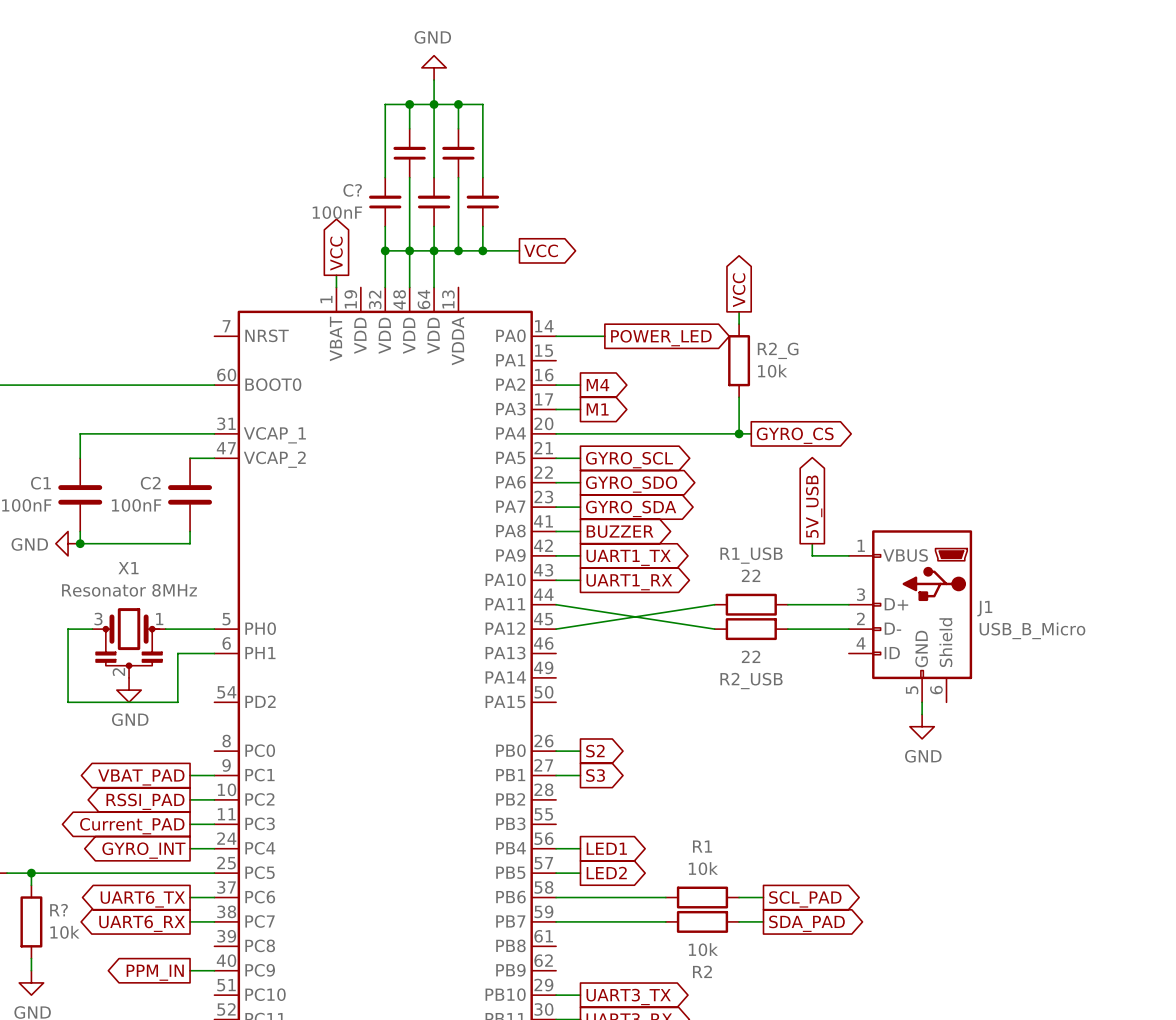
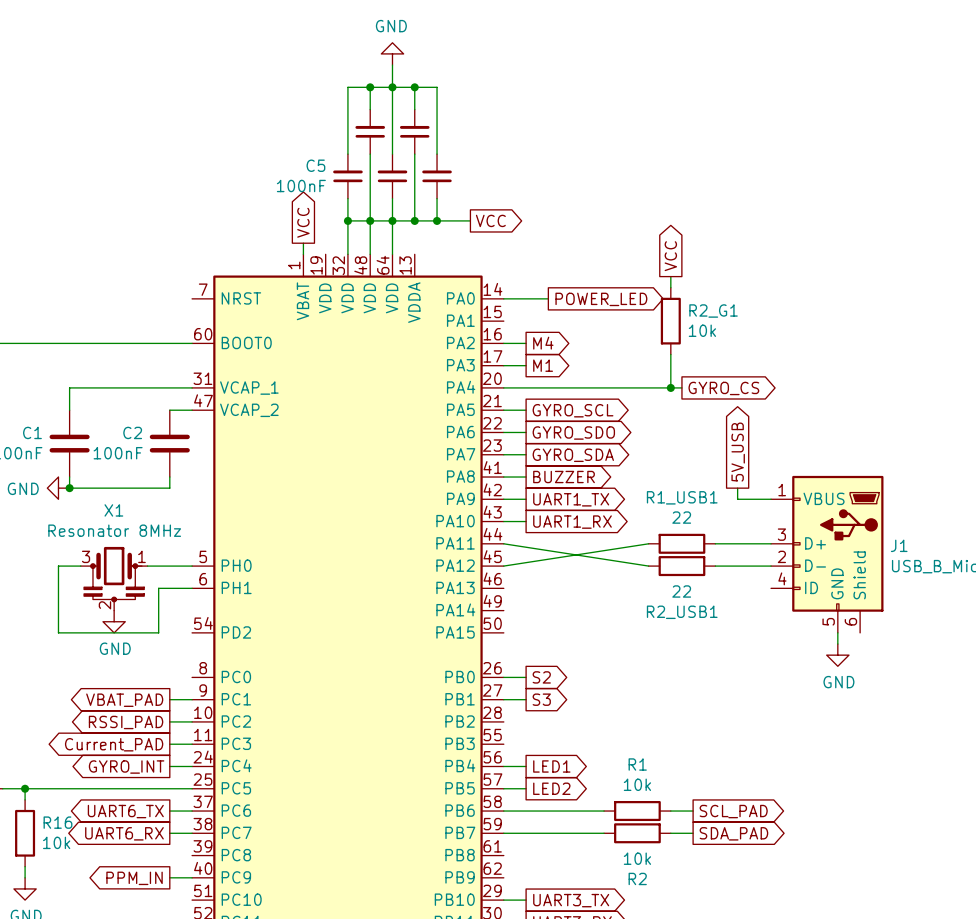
C? name: C? (352, 190) -> C5 (315, 165)
R2_G name: R2_G (778, 350) -> R2_G1 (713, 311)
R1_USB name: R1_USB (751, 555) -> R1_USB1 (682, 497)
R2_USB name: R2_USB (751, 681) -> R2_USB1 (682, 612)
R? name: R? (59, 910) -> R16 (57, 822)

